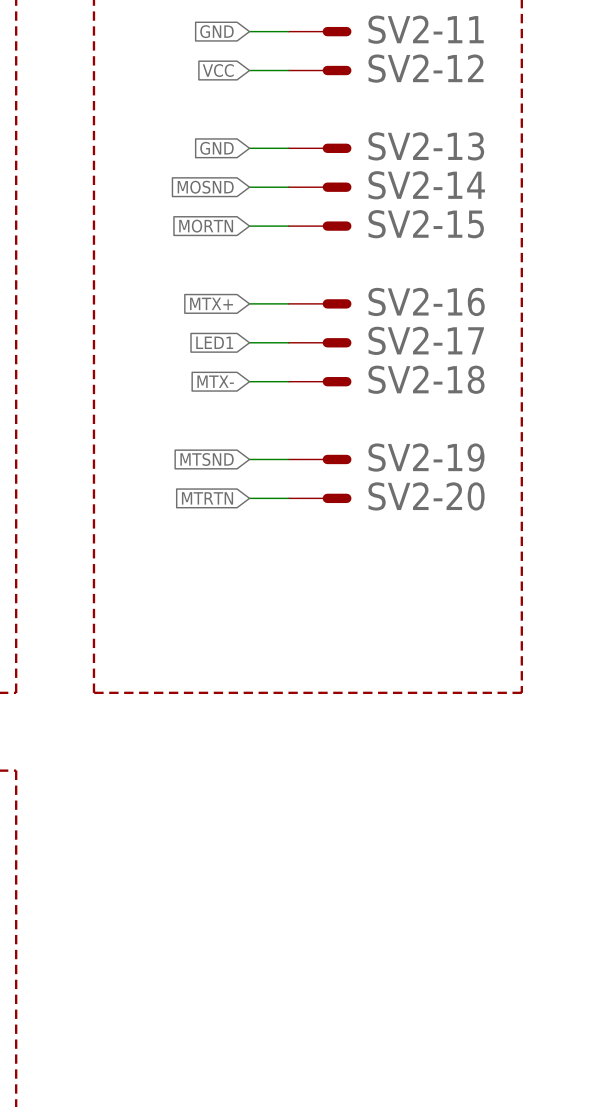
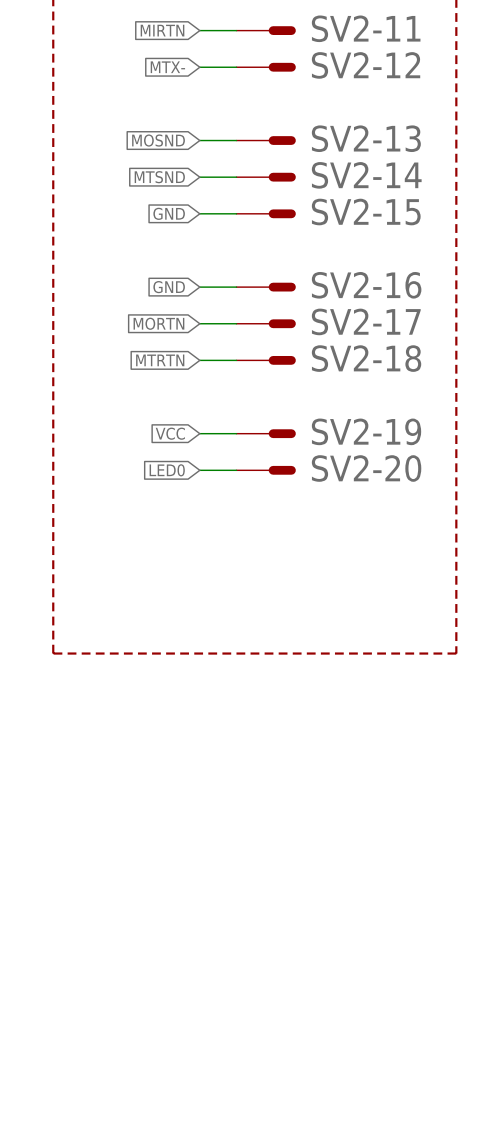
global label: GND (216, 31) -> MIRTN (162, 30)
global label: VCC (218, 70) -> MTX- (167, 67)
global label: GND (216, 148) -> MOSND (158, 140)
global label: MOSND (205, 187) -> MTSND (159, 177)
global label: MORTN (206, 226) -> GND (169, 213)
global label: MTX+ (211, 303) -> GND (169, 287)
global label: LED1 (214, 342) -> MORTN (158, 323)
global label: MTX- (215, 381) -> MTRTN (160, 360)
global label: MTSND (207, 459) -> VCC (170, 433)
global label: MTRTN (207, 498) -> LED0 (167, 470)

